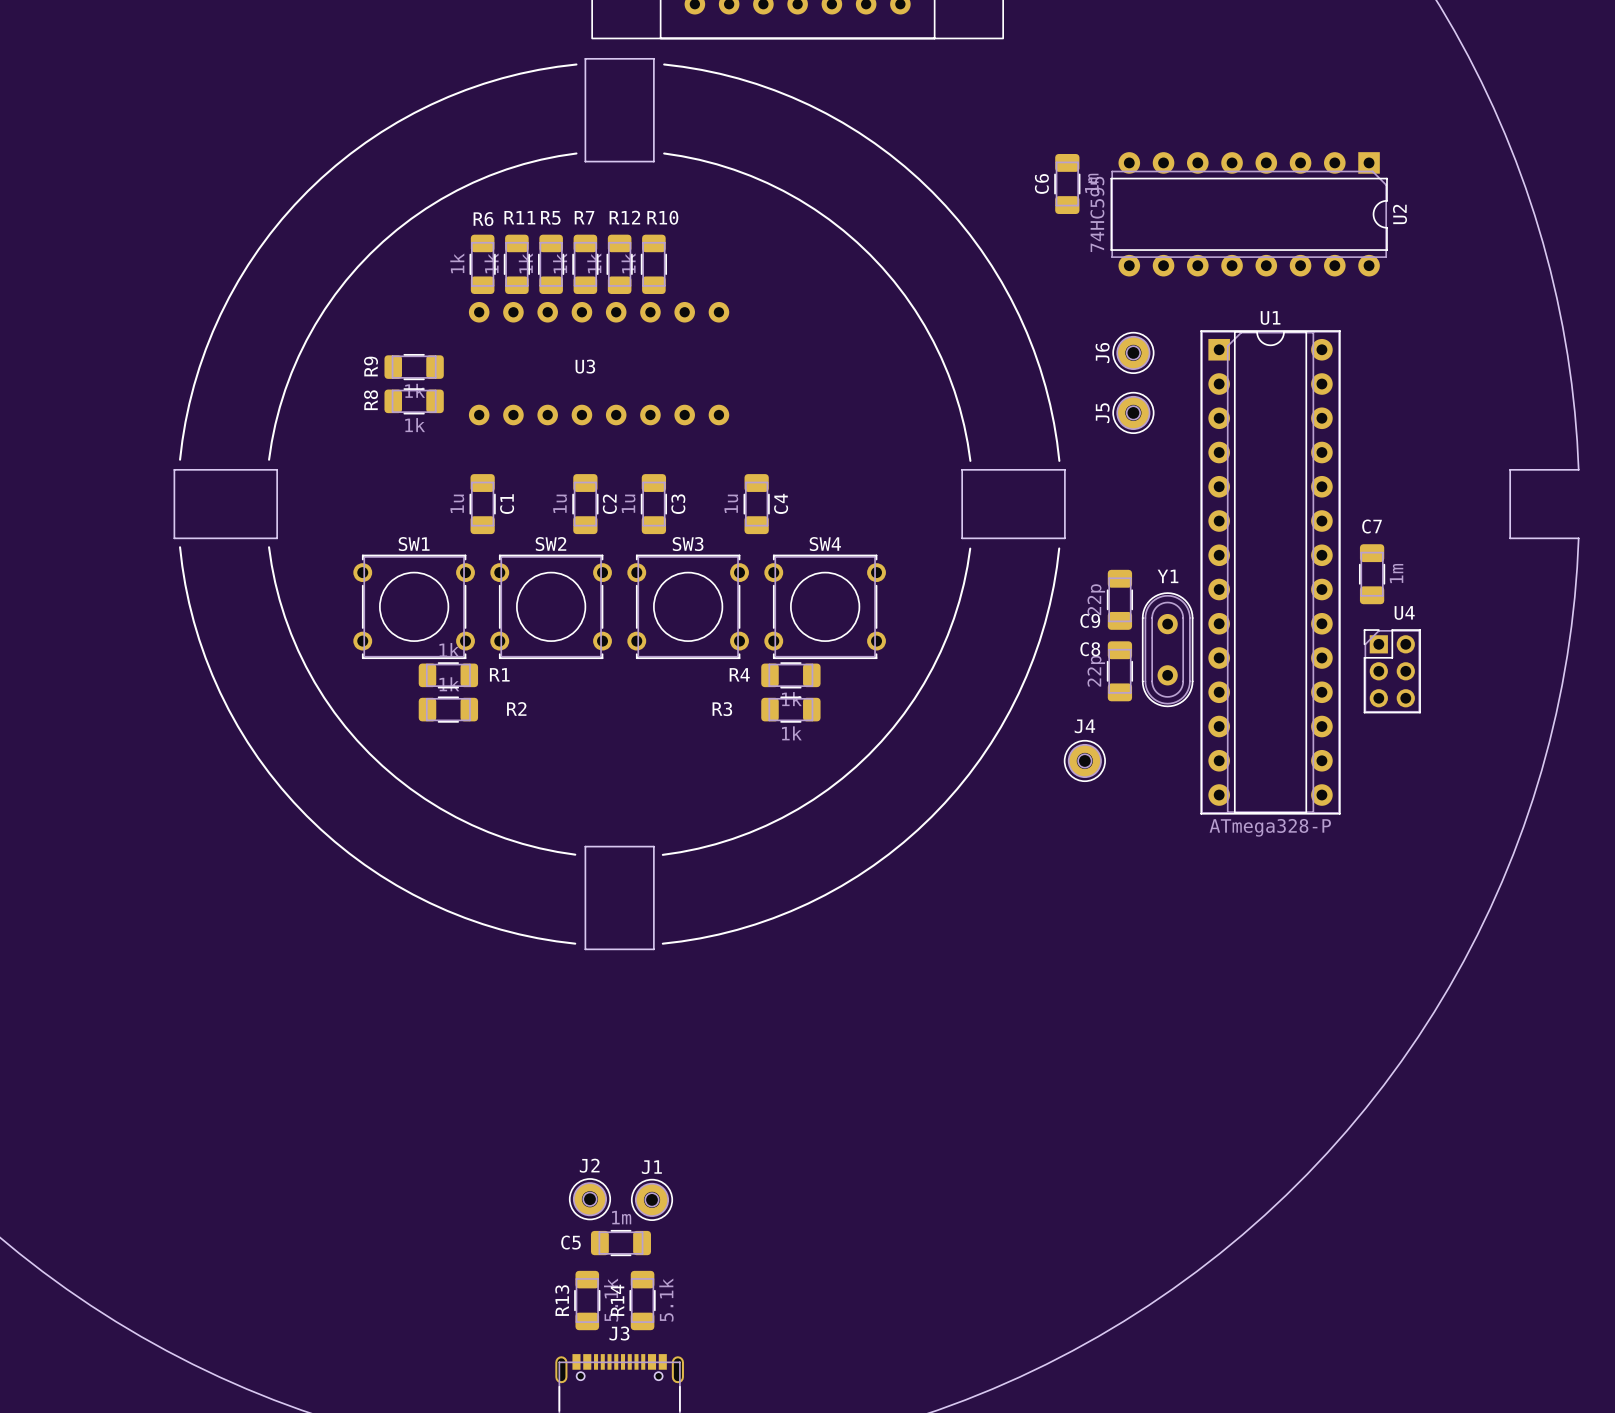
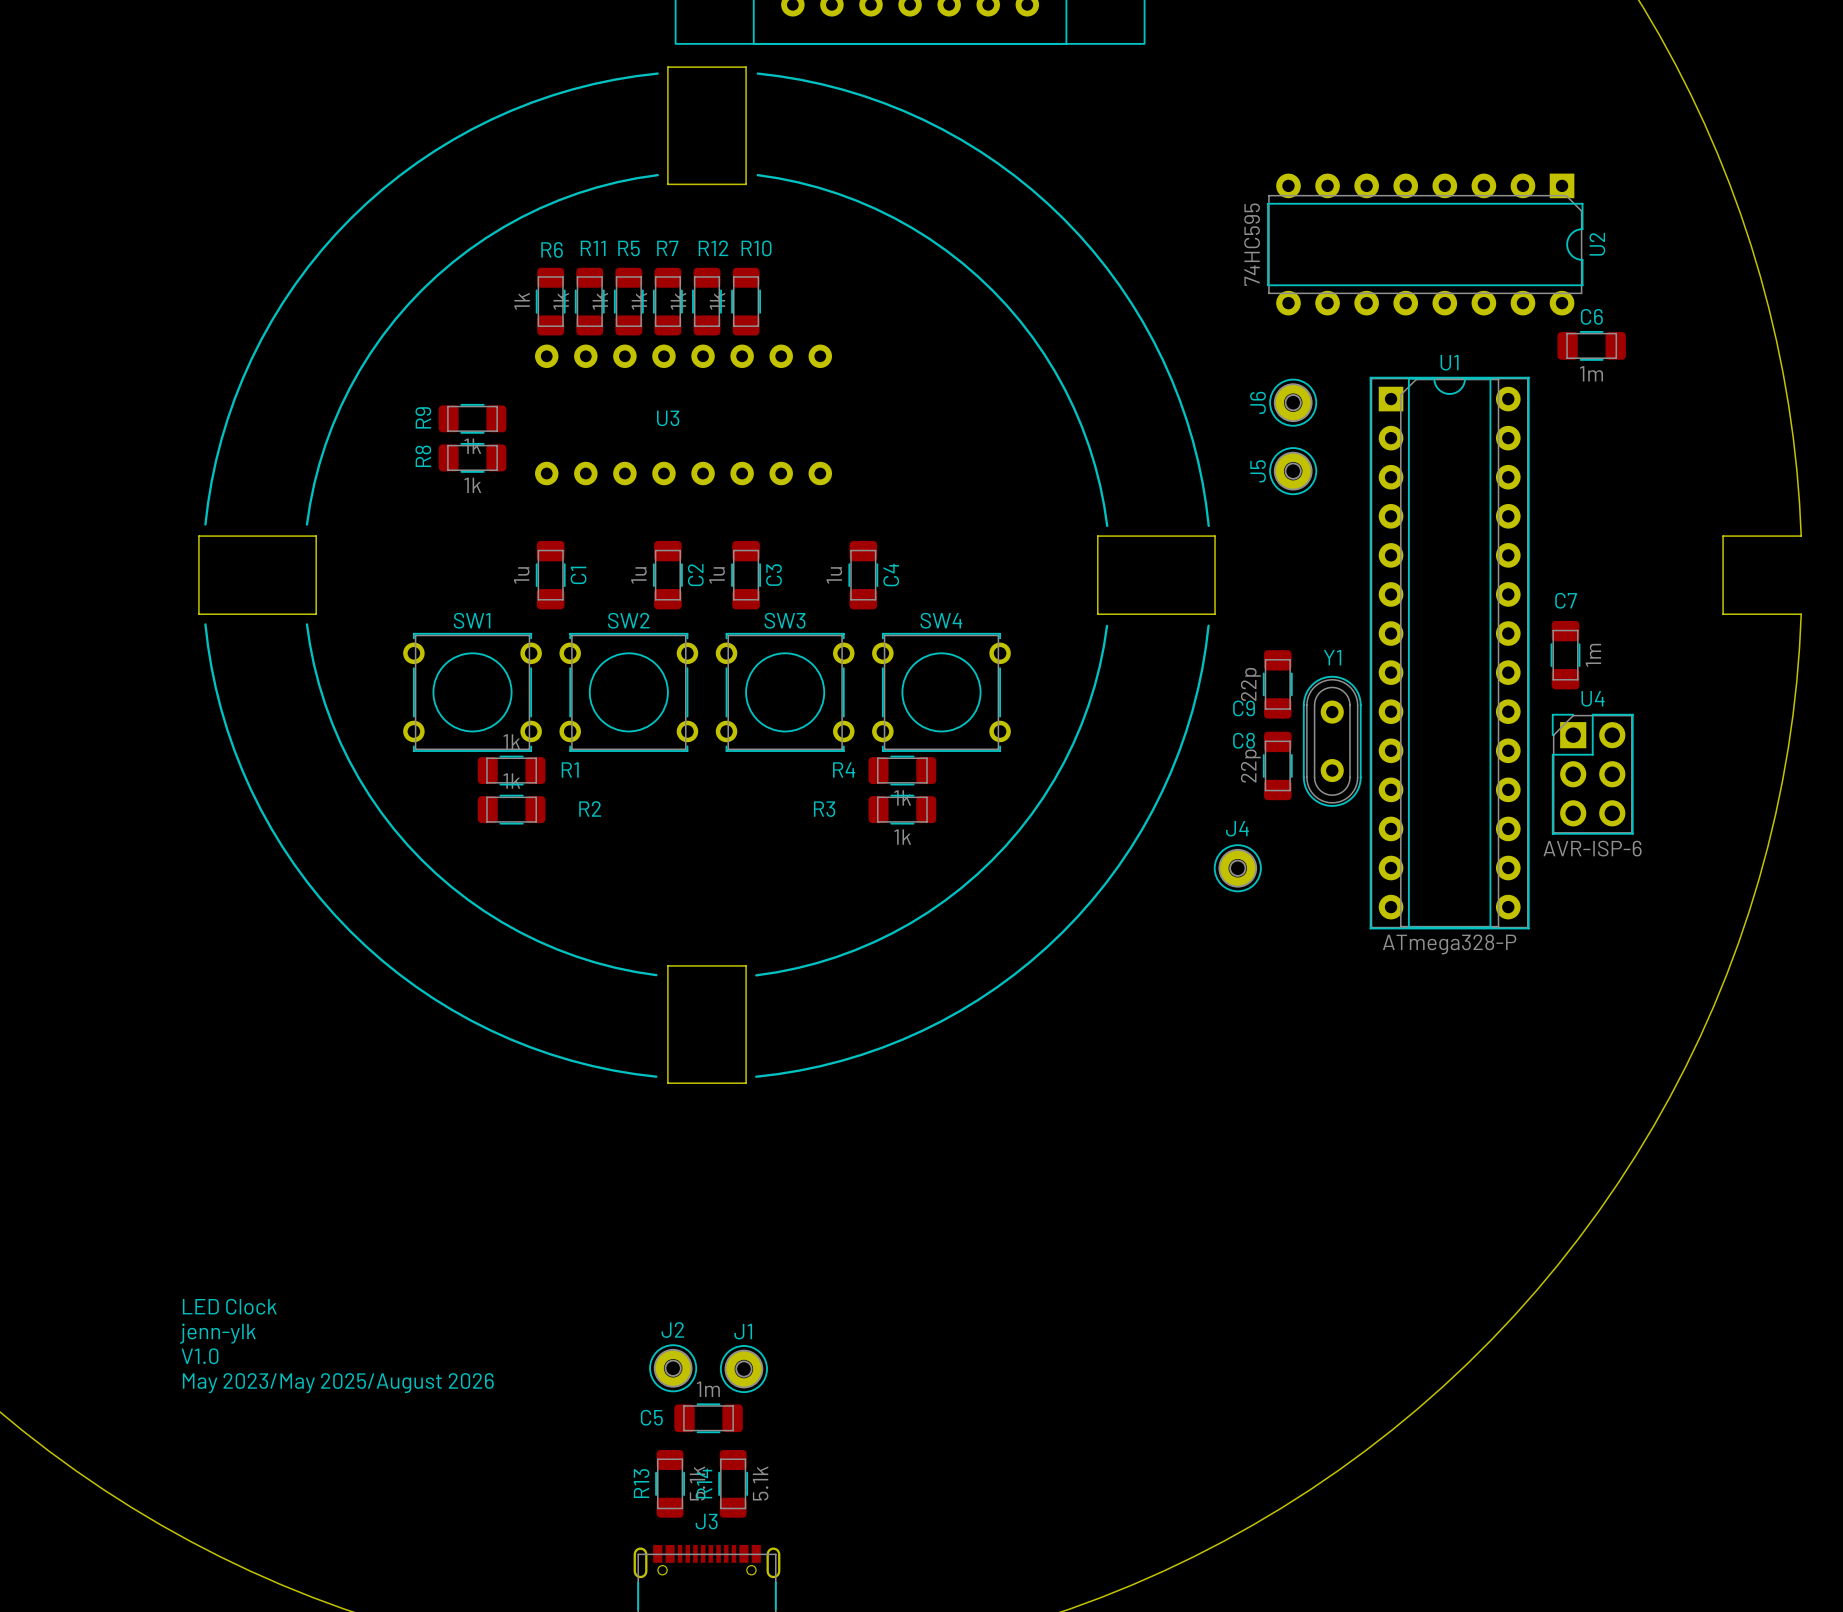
C6 rotation: 0° (1067, 184) -> 90° clockwise (1591, 345)
C6 position: (1067, 184) -> (1591, 345)
U4 footprint: [1363, 629, 1421, 714] -> [1551, 713, 1634, 835]
U4 value: none -> AVR-ISP-6 (1592, 848)
text: none -> LED Clock (229, 1306)
text: none -> jenn-ylk (217, 1333)
text: none -> V1.0 (199, 1356)
text: none -> May 2023/May 2025/August 2026 (338, 1383)

